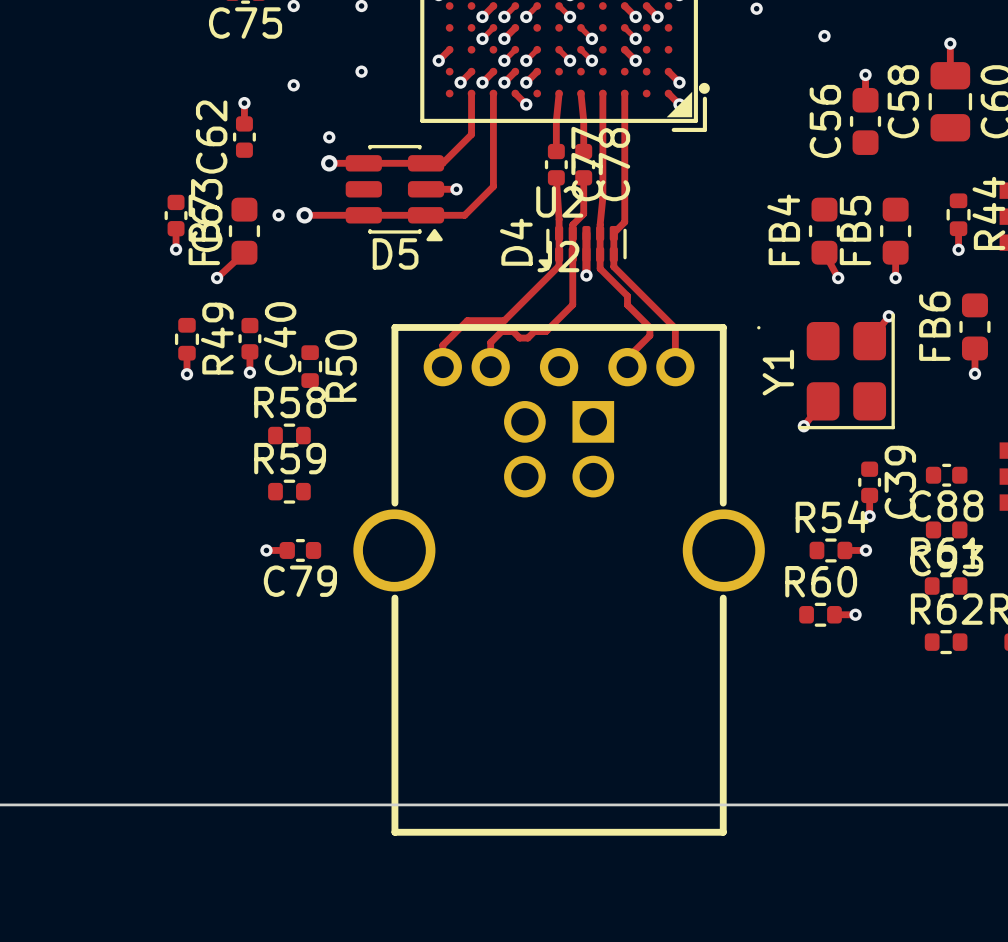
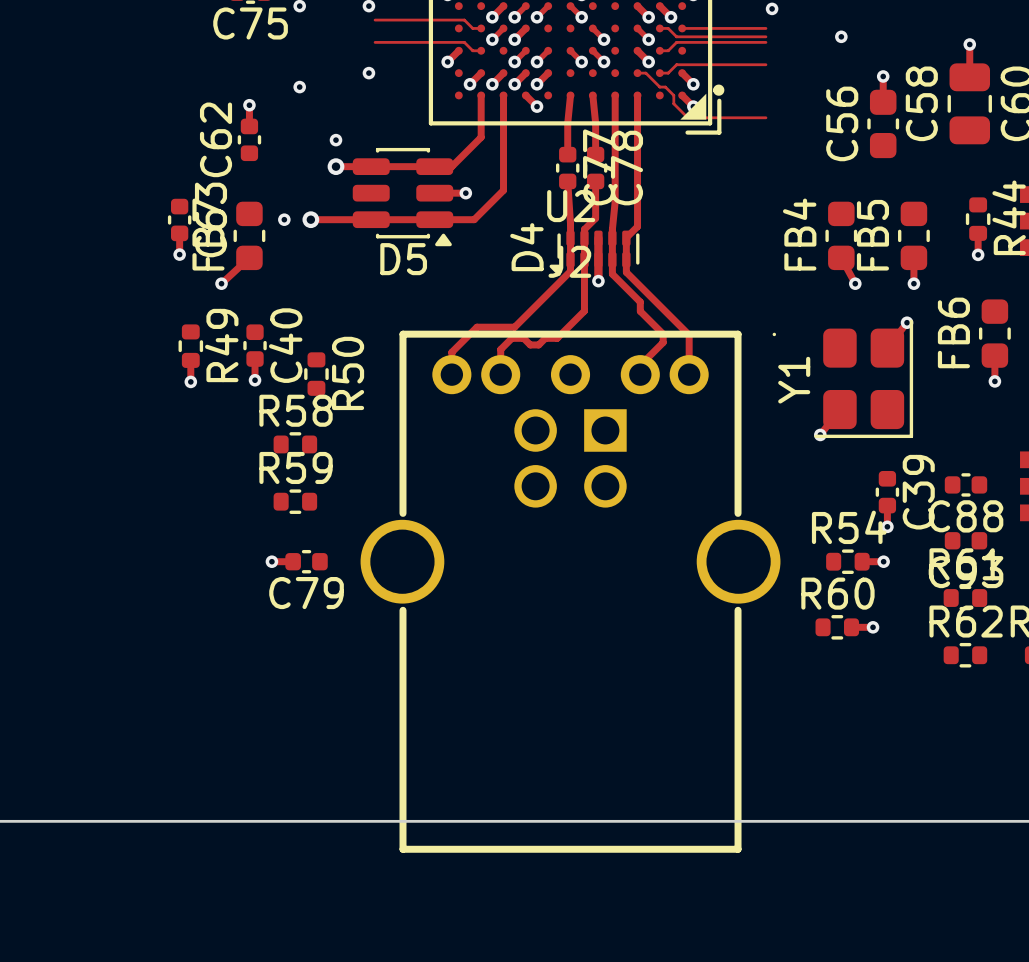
track: none -> (375, 20) (464, 20) (472, 28) (481, 28)
track: none -> (659, 28) (668, 28) (676, 36) (765, 36)
track: none -> (682, 28) (765, 28)
track: none -> (375, 42) (464, 42) (472, 50) (481, 50)
track: none -> (765, 42) (676, 42) (668, 50) (659, 50)
track: none -> (765, 64) (676, 64) (668, 73) (659, 73)
track: none -> (637, 73) (645, 73) (659, 87) (665, 87) (673, 95) (673, 103) (687, 117) (765, 117)

